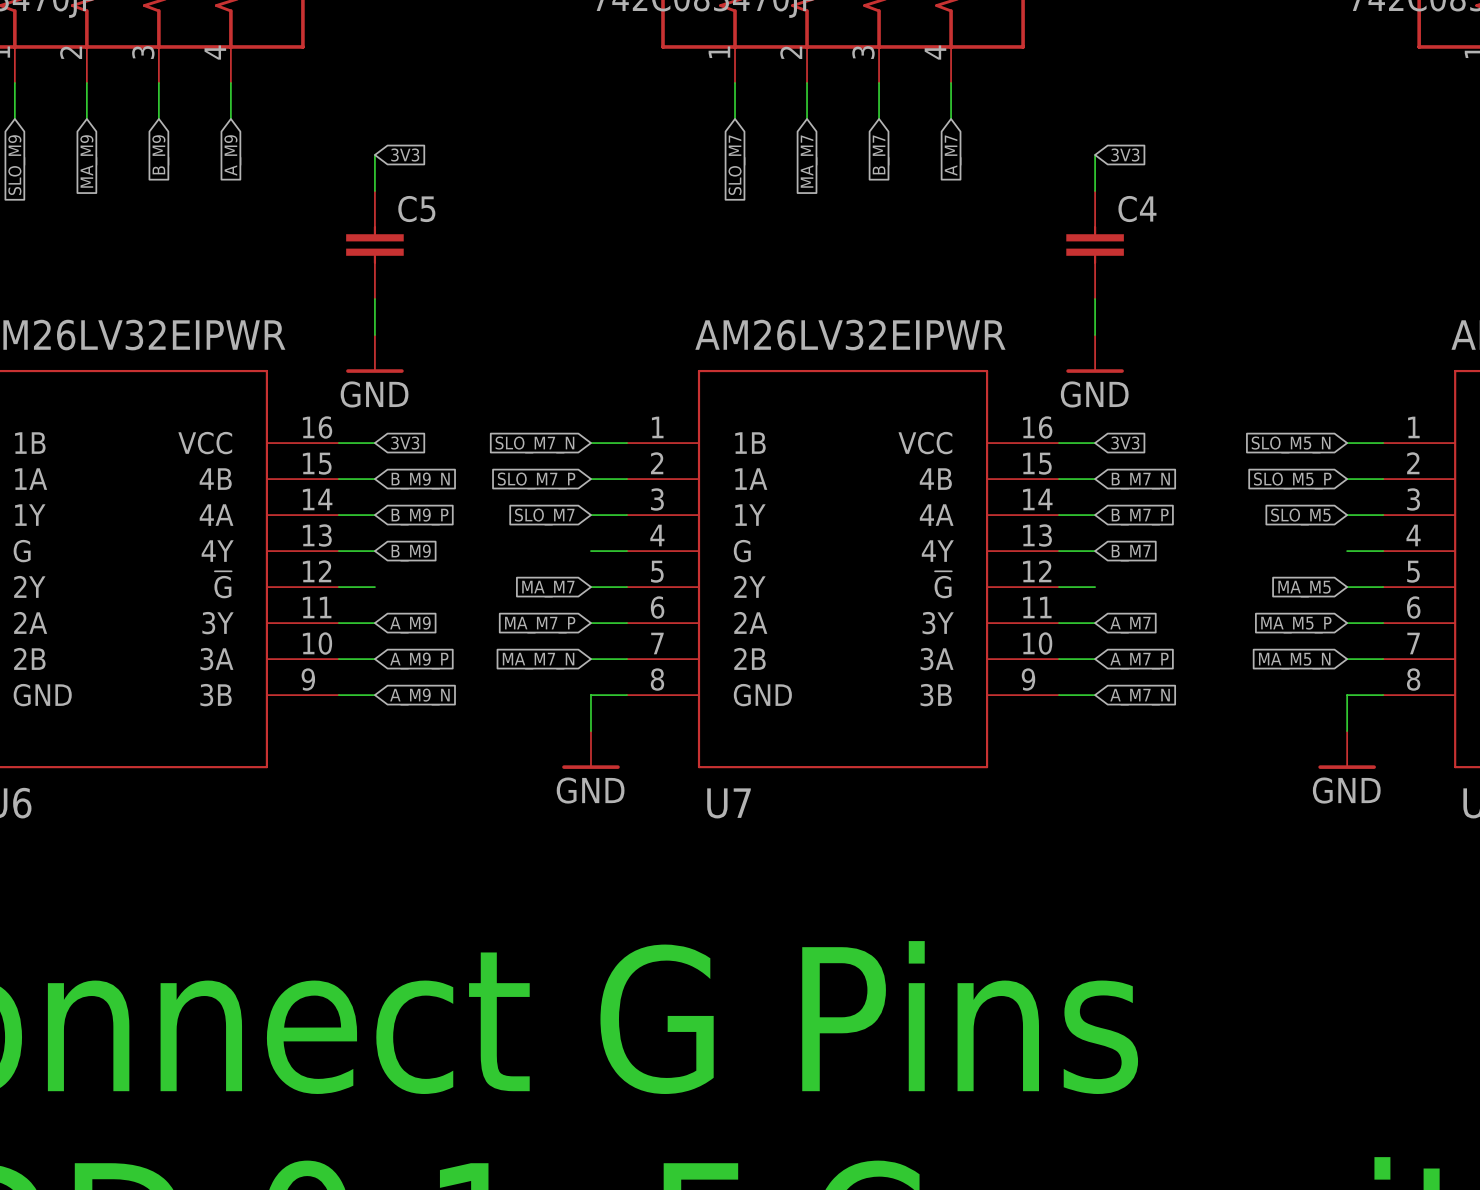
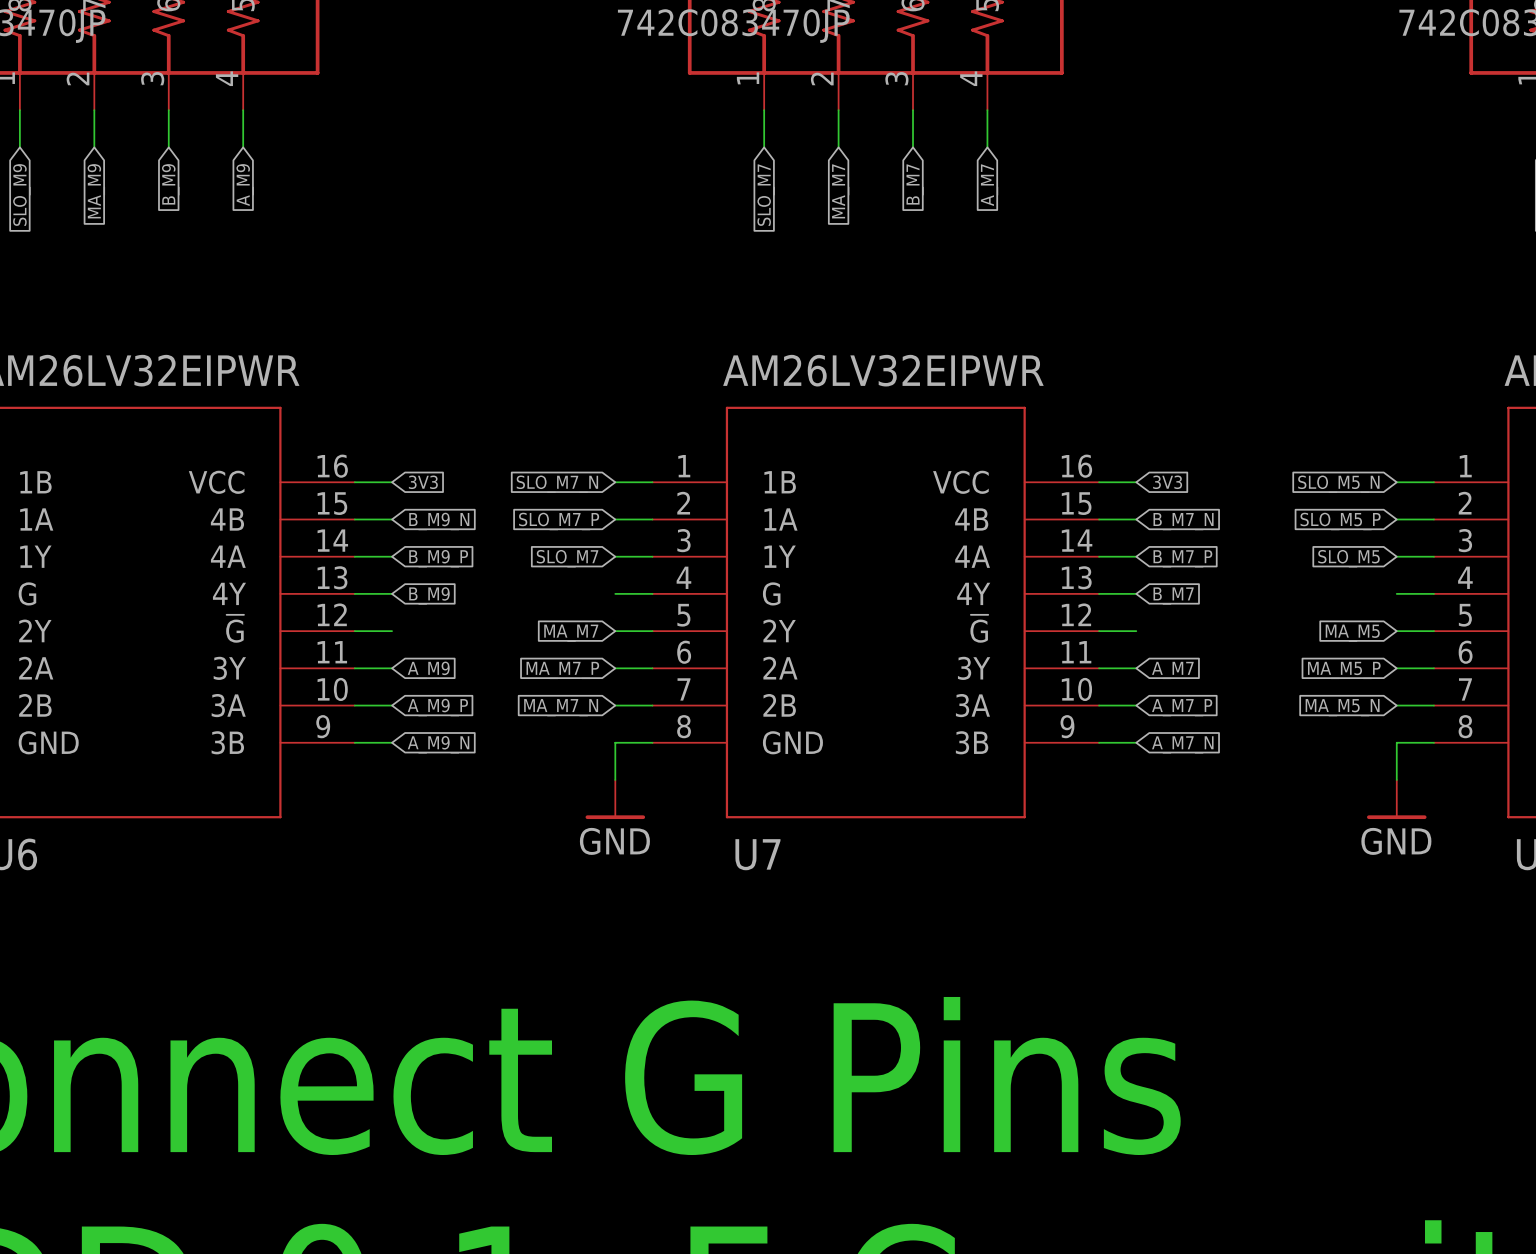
wire: (374, 154) (374, 191) -> none
wire: (1095, 154) (1095, 191) -> none
global label: 3V3 (405, 155) -> none
global label: 3V3 (1125, 155) -> none
C5: (374, 245) -> none
C4: (1095, 245) -> none
wire: (374, 299) (374, 335) -> none
wire: (1095, 299) (1095, 335) -> none
power symbol: GND (374, 353) -> none
power symbol: GND (1095, 353) -> none

